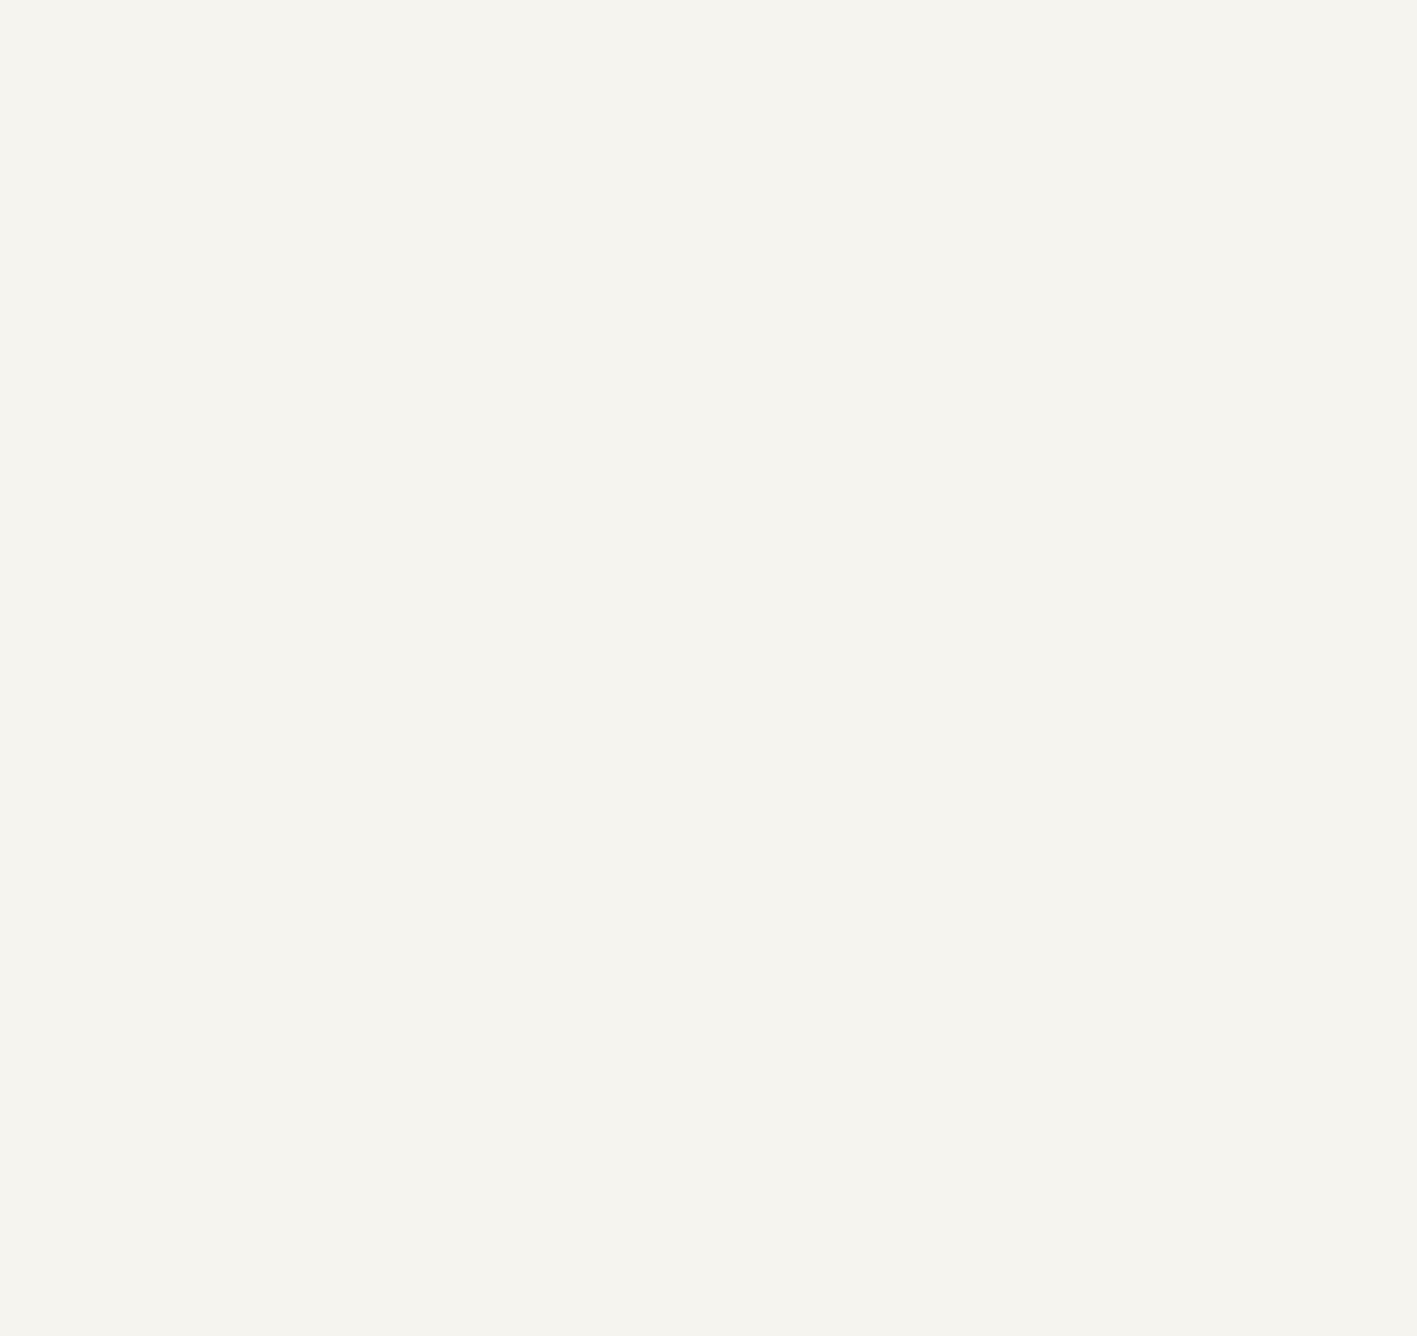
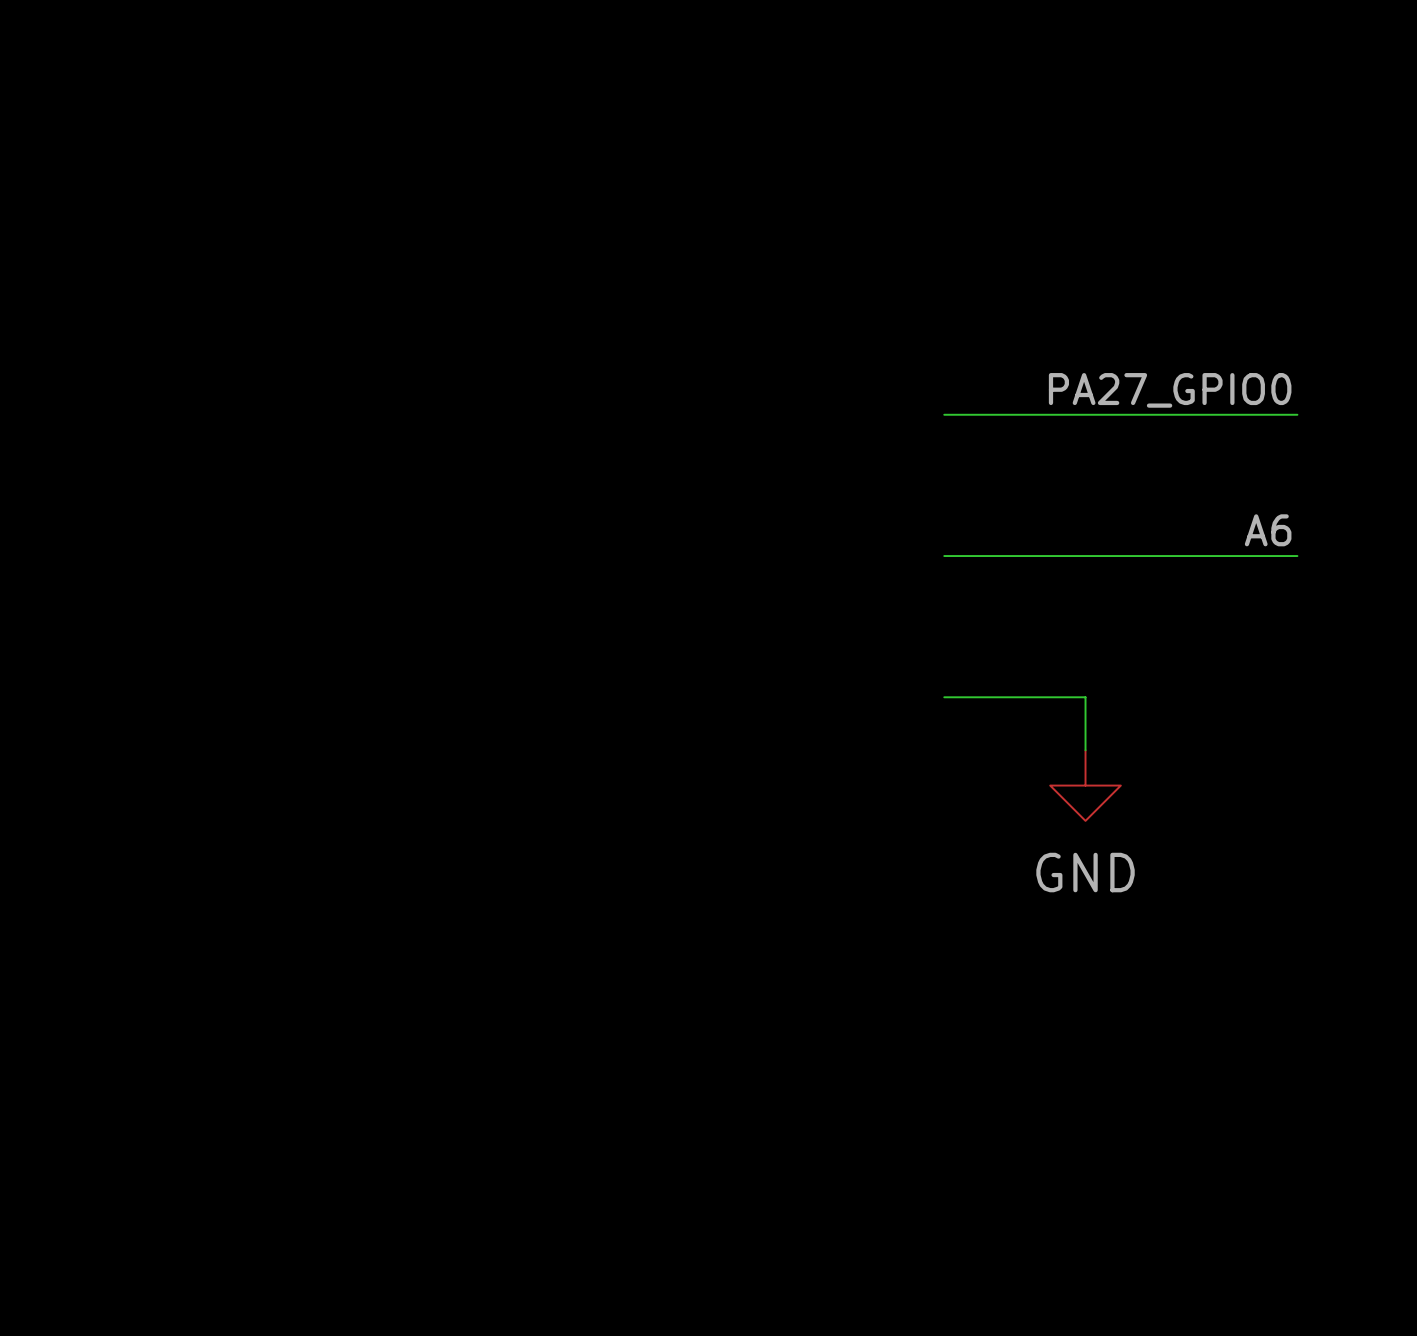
label: none -> PA27_GPIO0 (1170, 390)
wire: none -> (944, 414) (1297, 414)
label: none -> A6 (1268, 530)
wire: none -> (944, 556) (1297, 556)
wire: none -> (944, 697) (1085, 697) (1085, 750)
power symbol: none -> GND (1085, 785)

